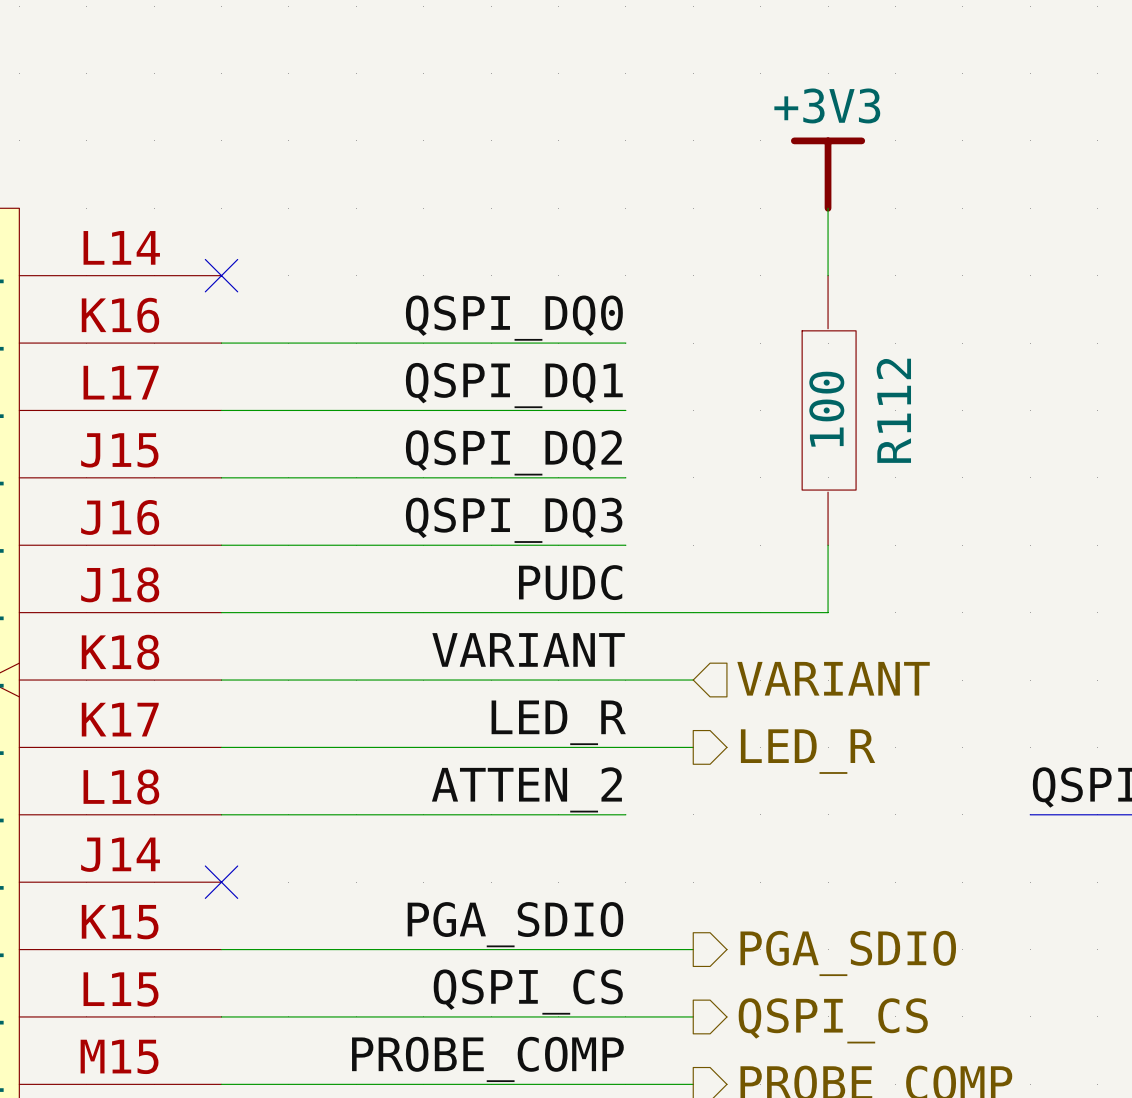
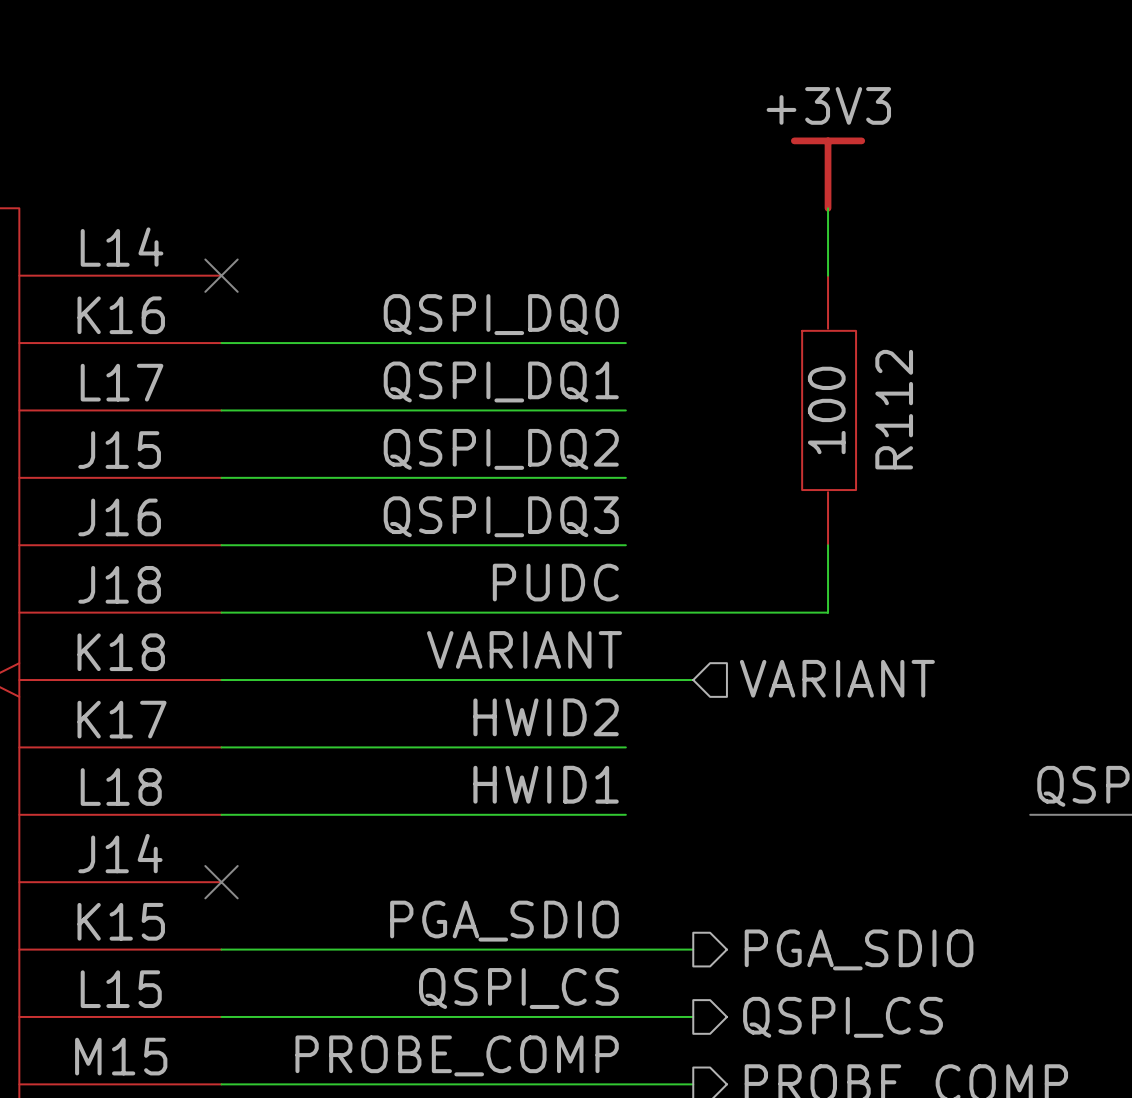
label: LED_R (558, 722) -> HWID2 (546, 717)
wire: (625, 747) (693, 747) -> none
hierarchical label: LED_R (808, 751) -> none
label: ATTEN_2 (526, 789) -> HWID1 (546, 784)

